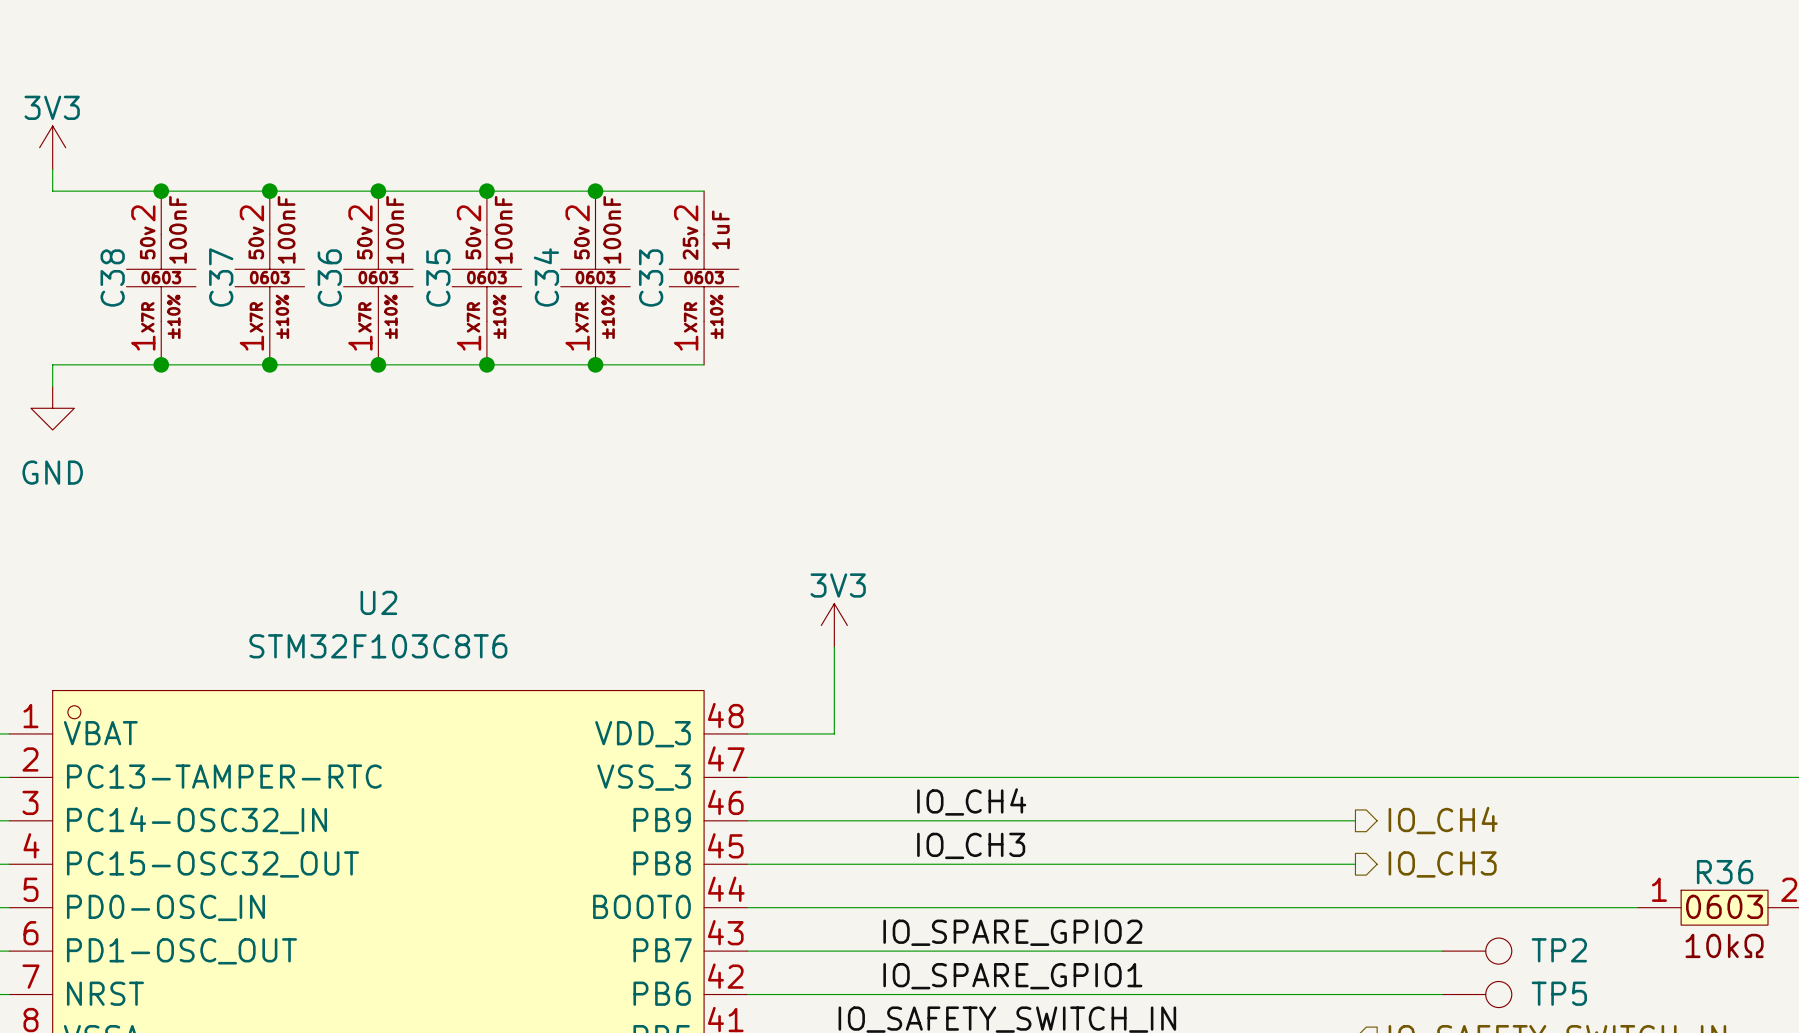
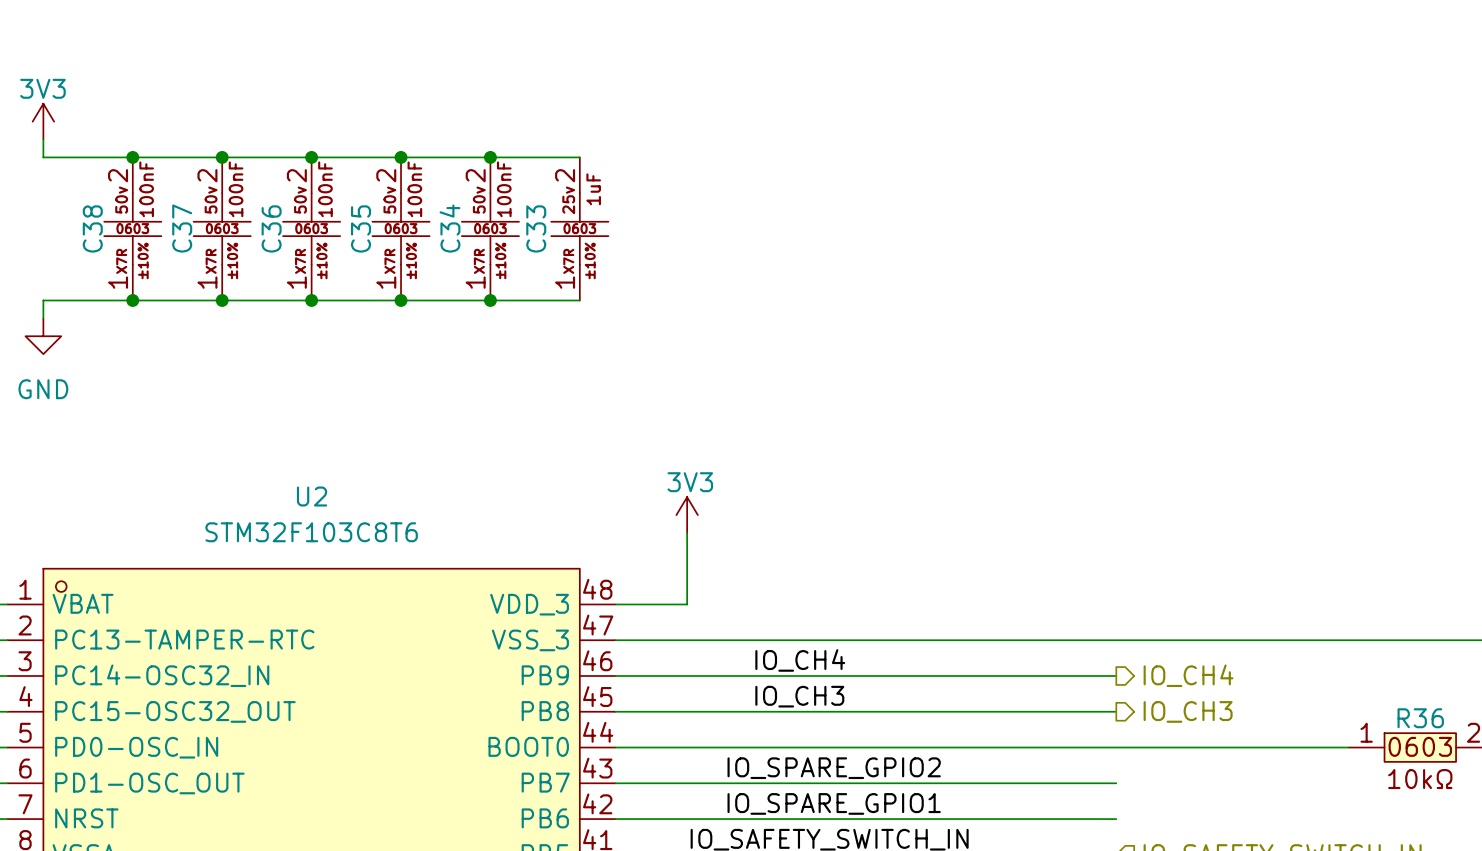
wire: (1355, 951) (1442, 951) -> none
TP2: (1477, 951) -> none
wire: (1355, 994) (1442, 994) -> none
TP5: (1477, 994) -> none

